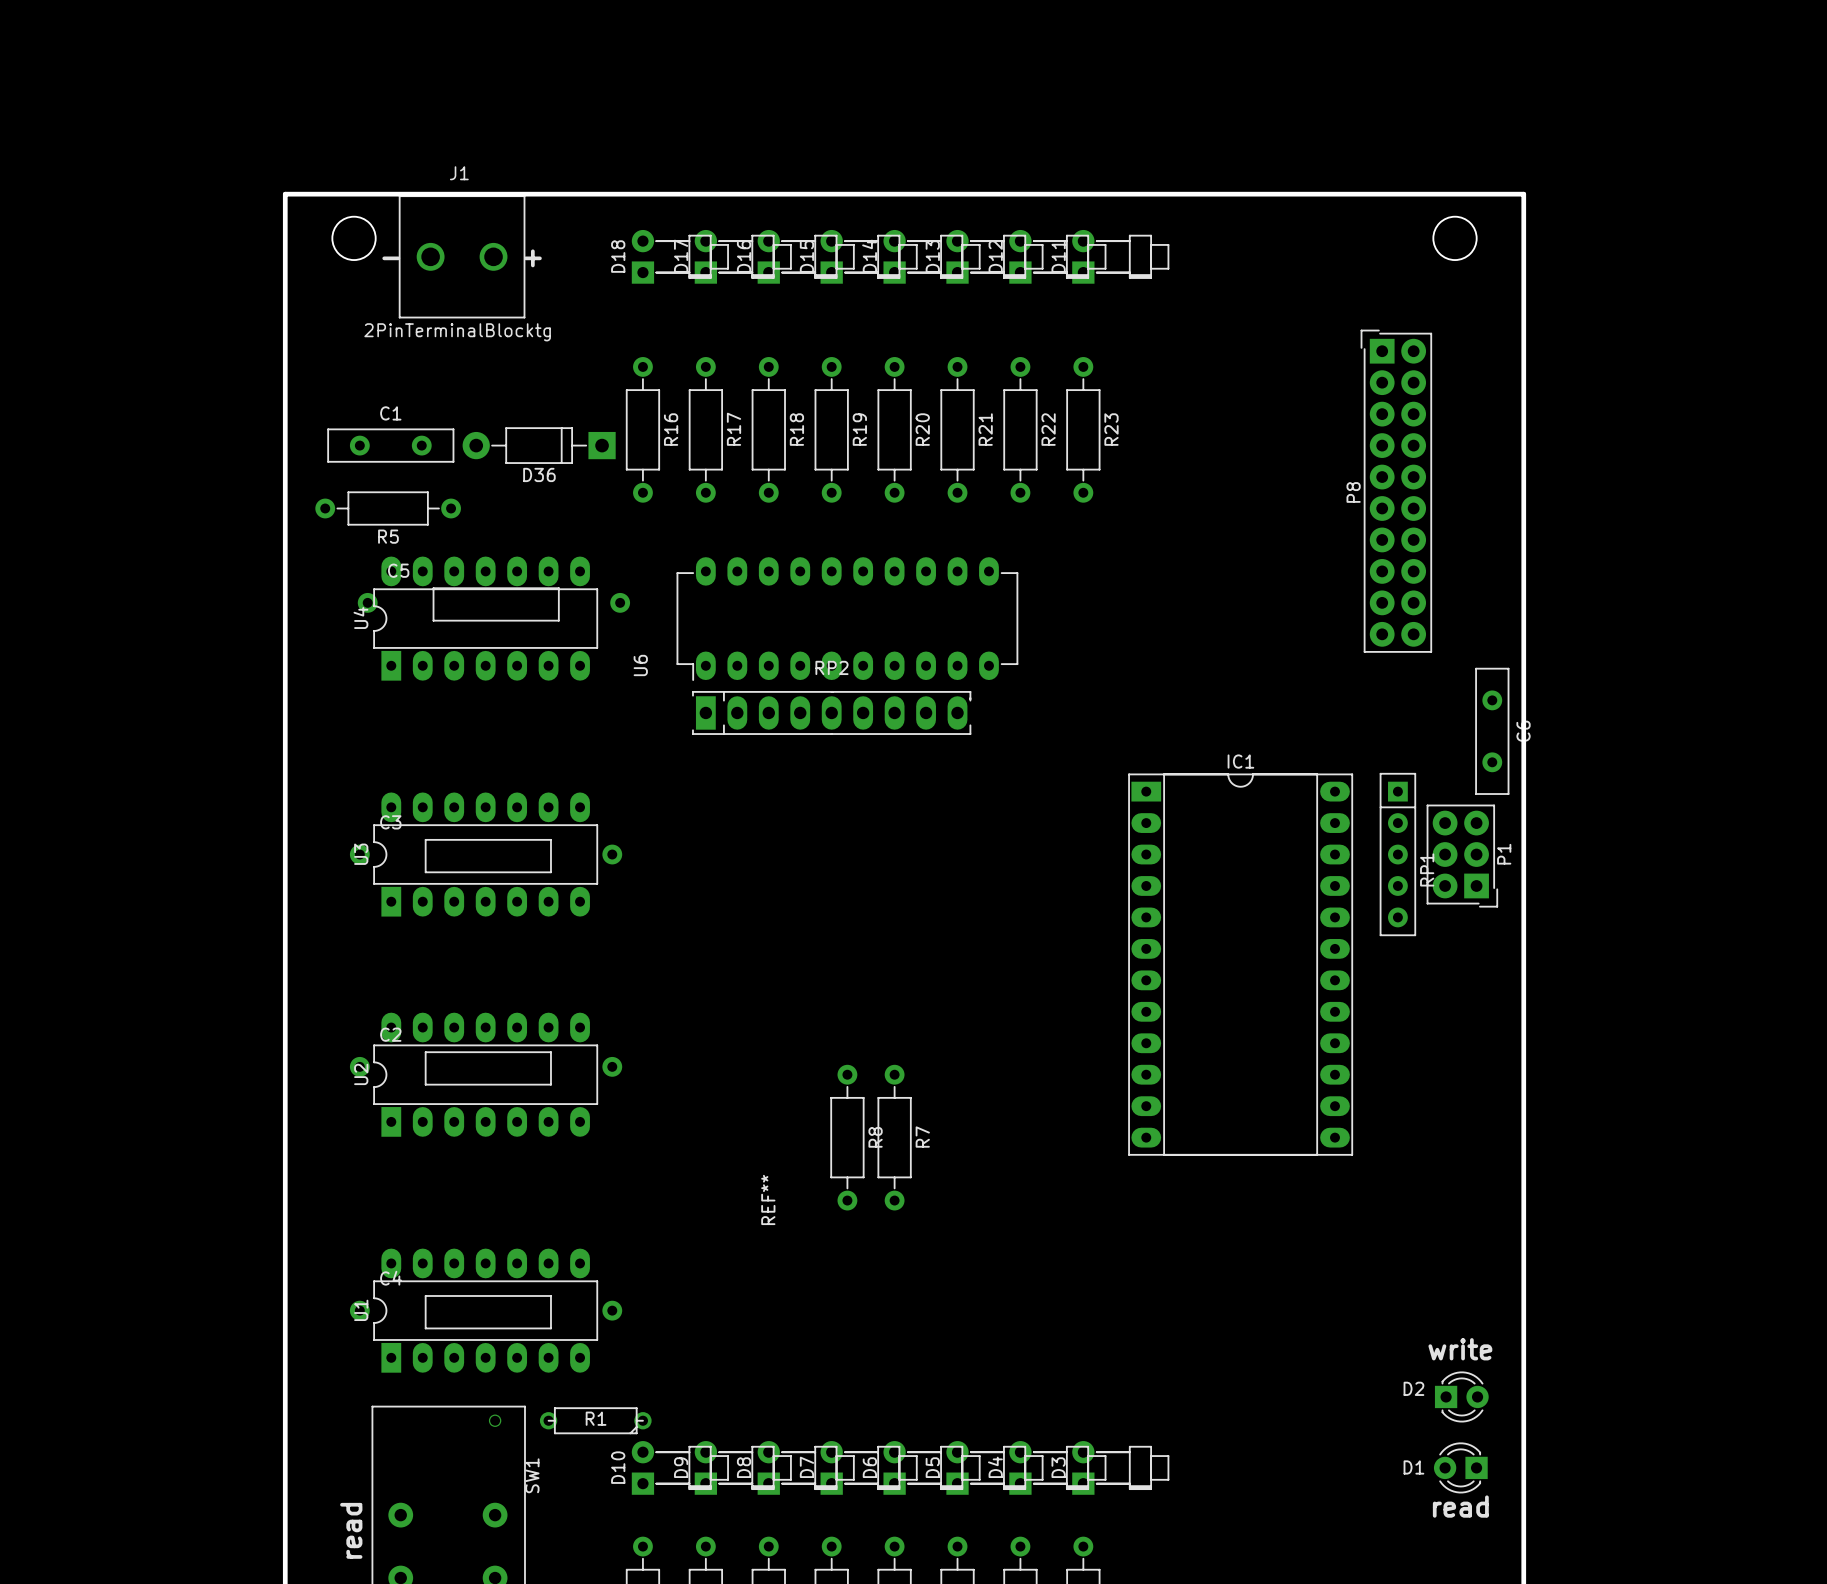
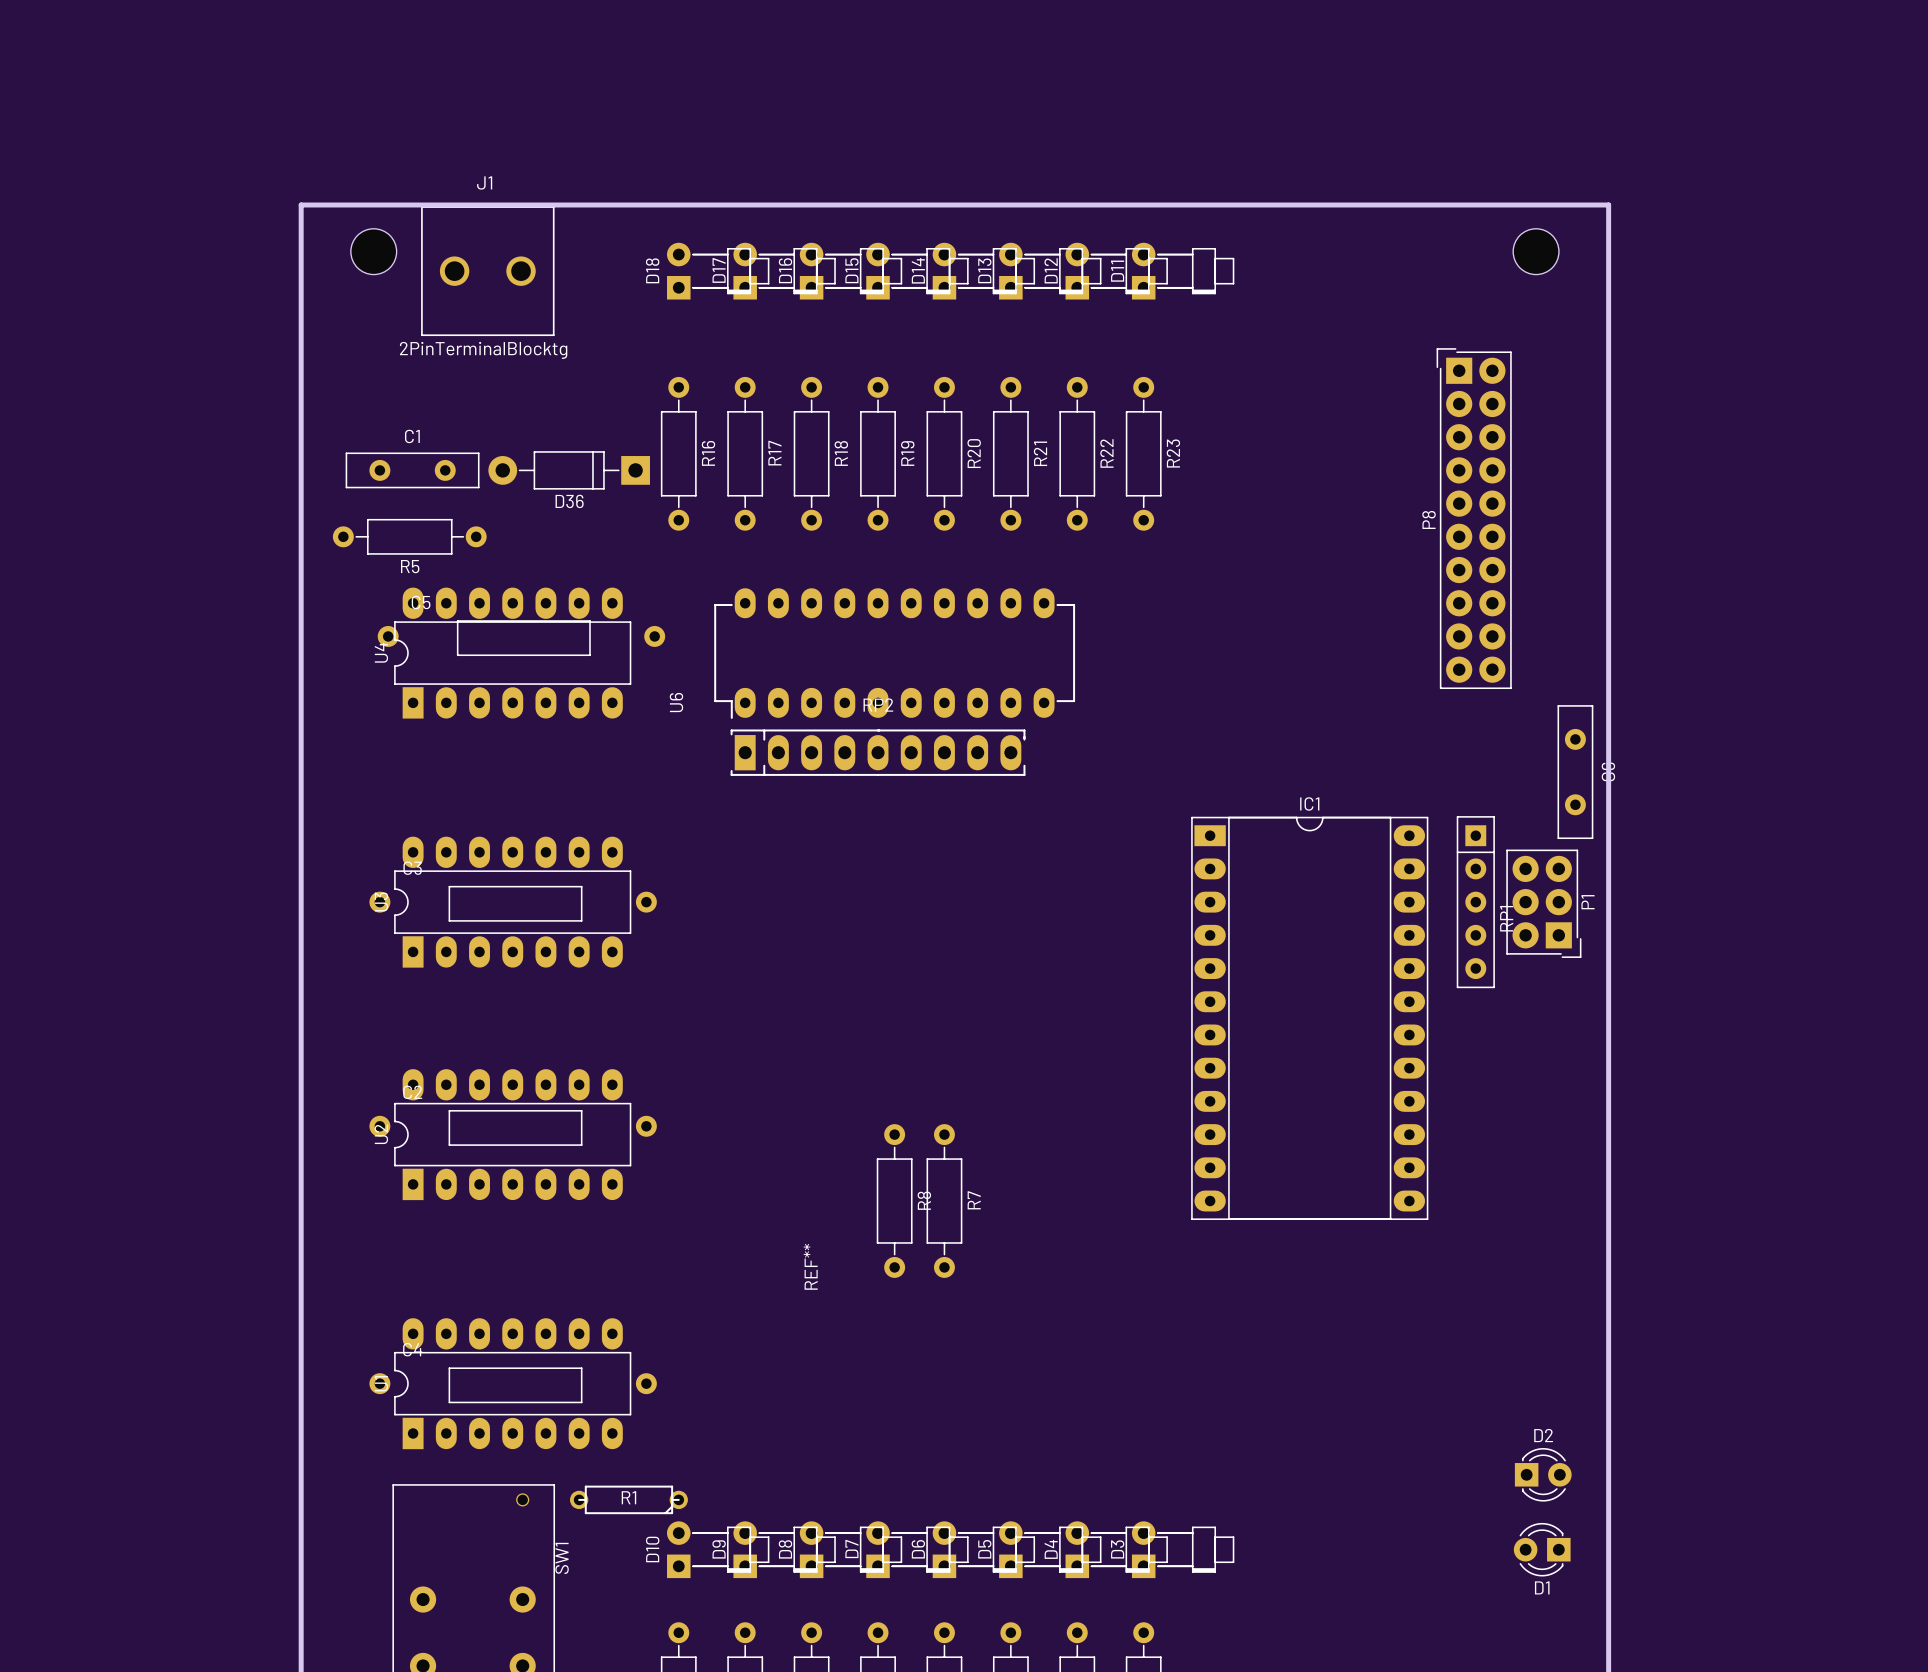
text: - (391, 258) -> none
text: + (532, 258) -> none
text: write (1460, 1349) -> none
D2 name position: D2 (1413, 1388) -> D2 (1543, 1435)
D1 name position: D1 (1413, 1467) -> D1 (1542, 1587)
text: read (1460, 1506) -> none
text: read (351, 1530) -> none

